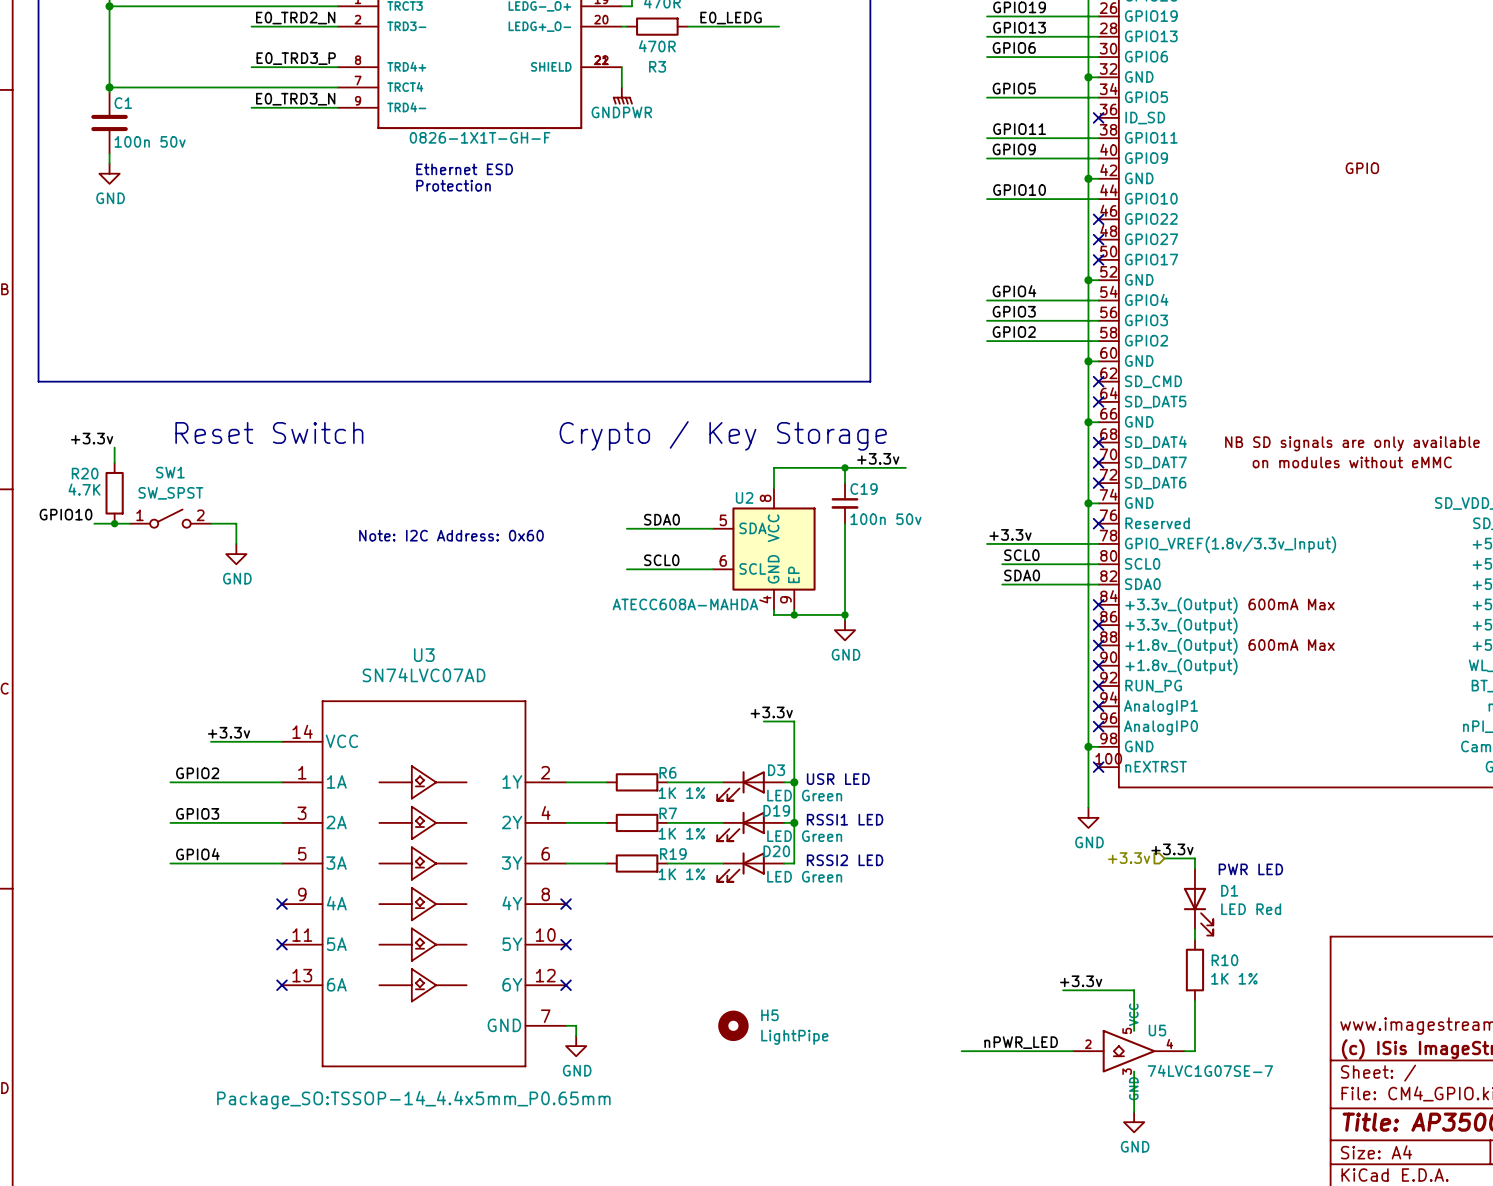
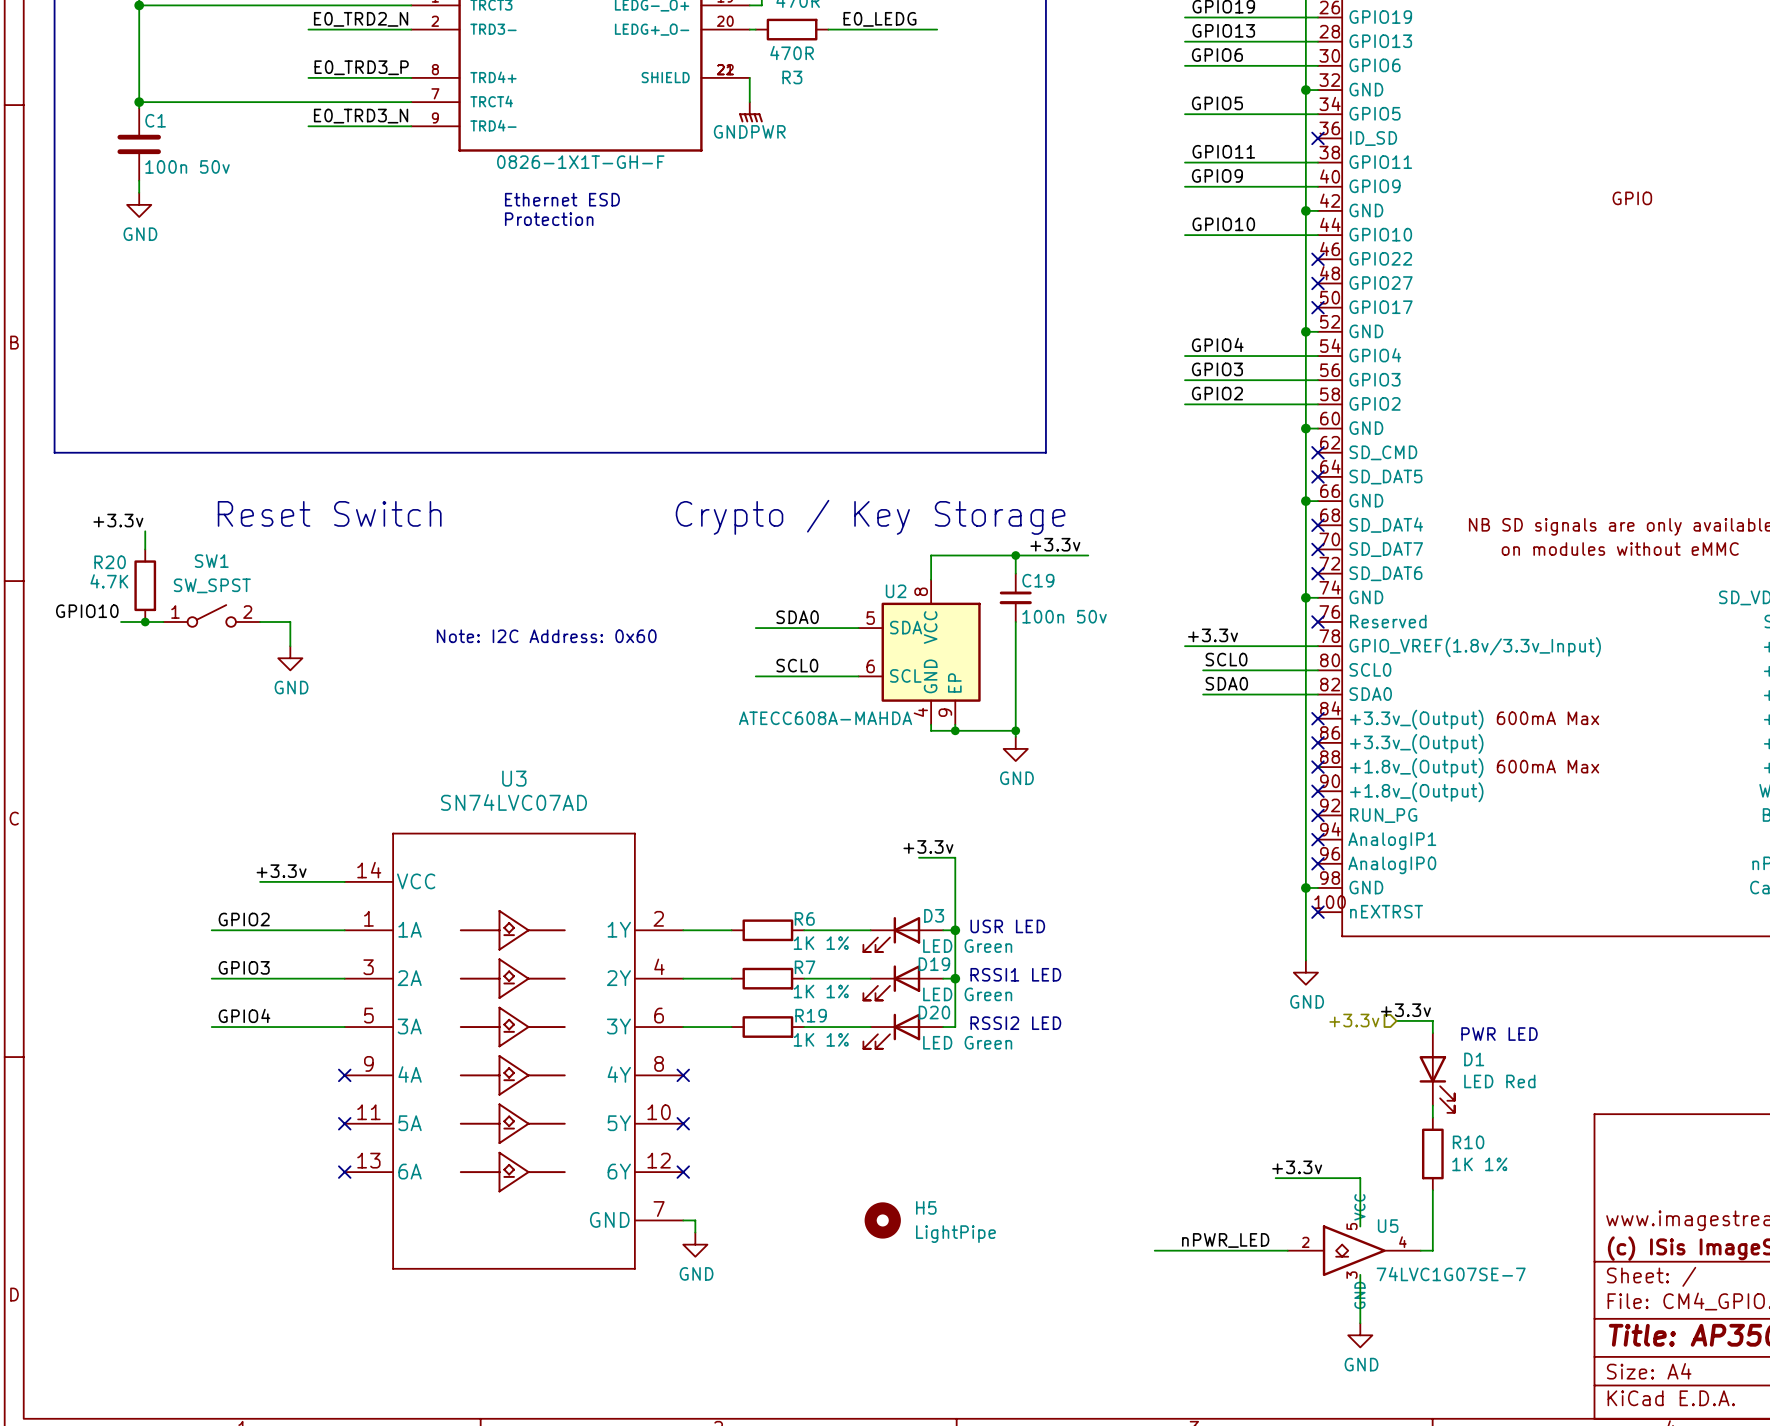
U3 text: Package_SO:TSSOP-14_4.4x5mm_P0.65mm (413, 1100) -> none

